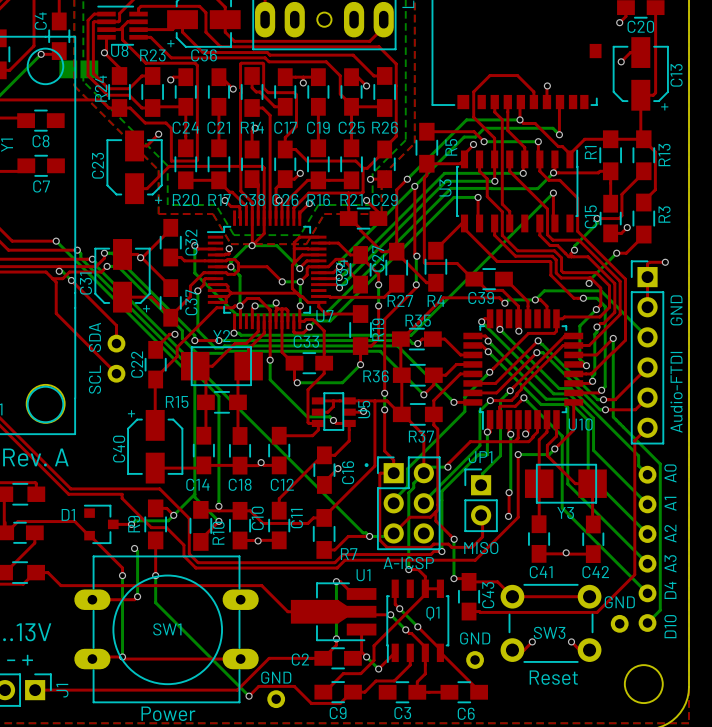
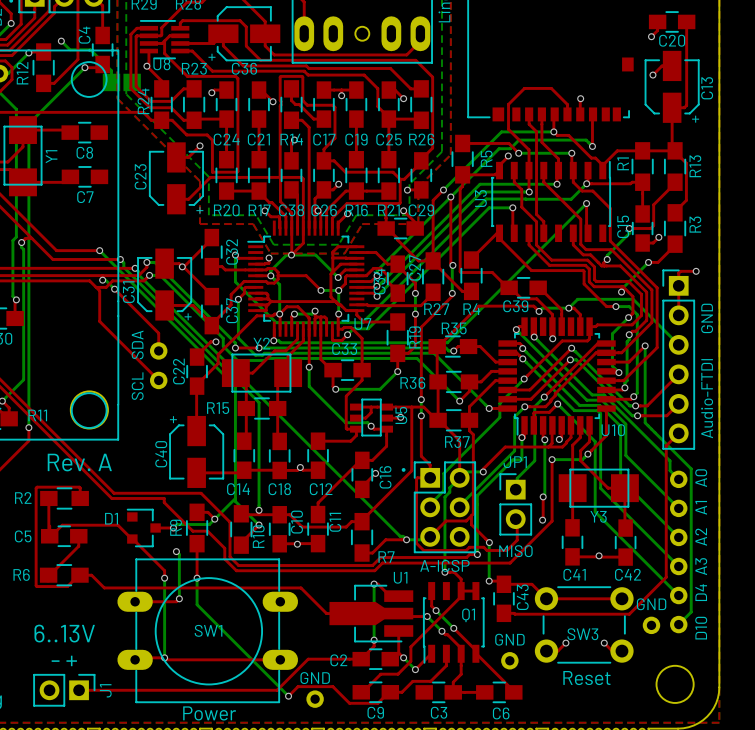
bottom track: none -> (61, 41) (70, 49) (90, 49) (111, 70) (111, 82)
via: none -> (61, 41)

